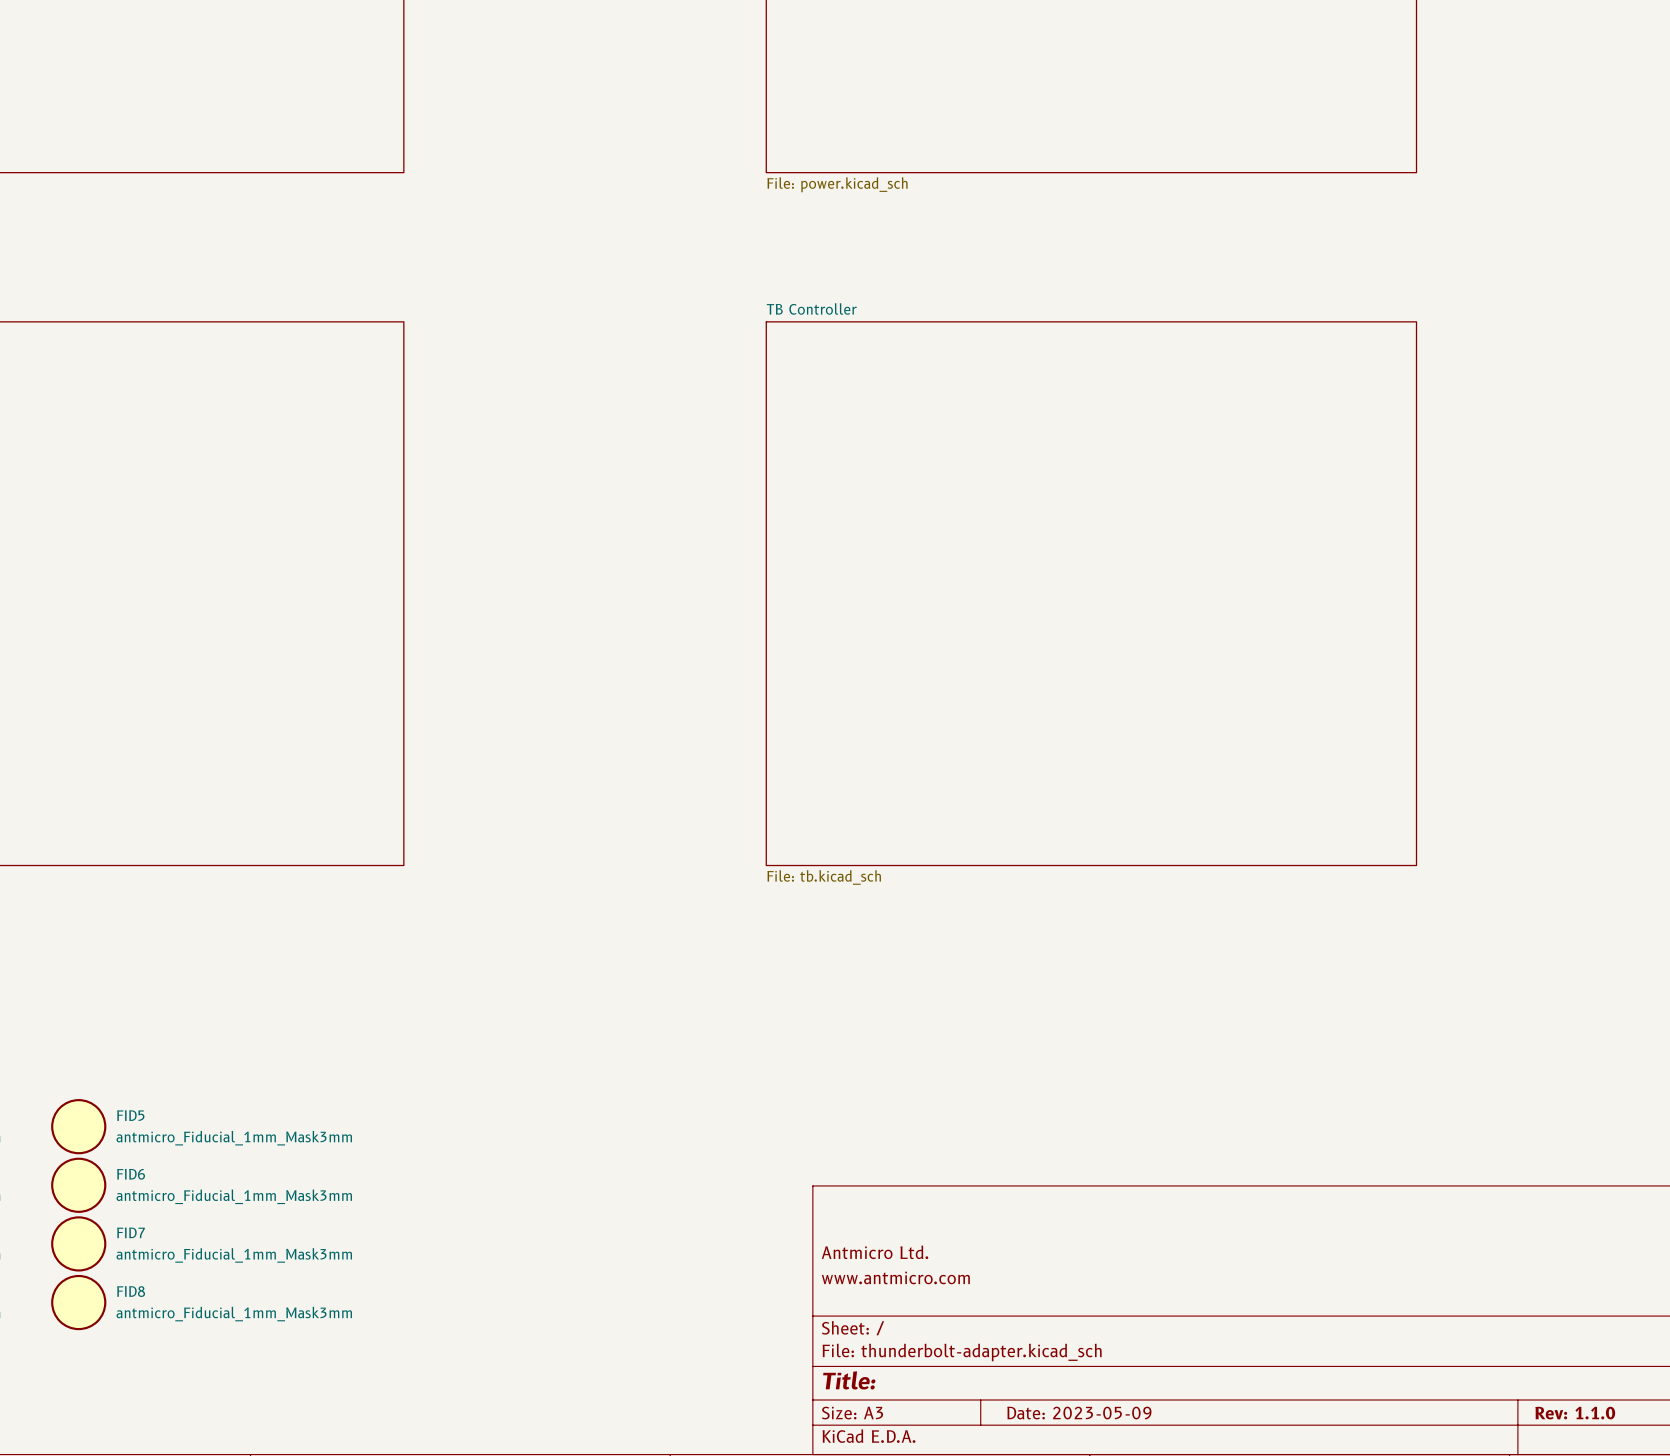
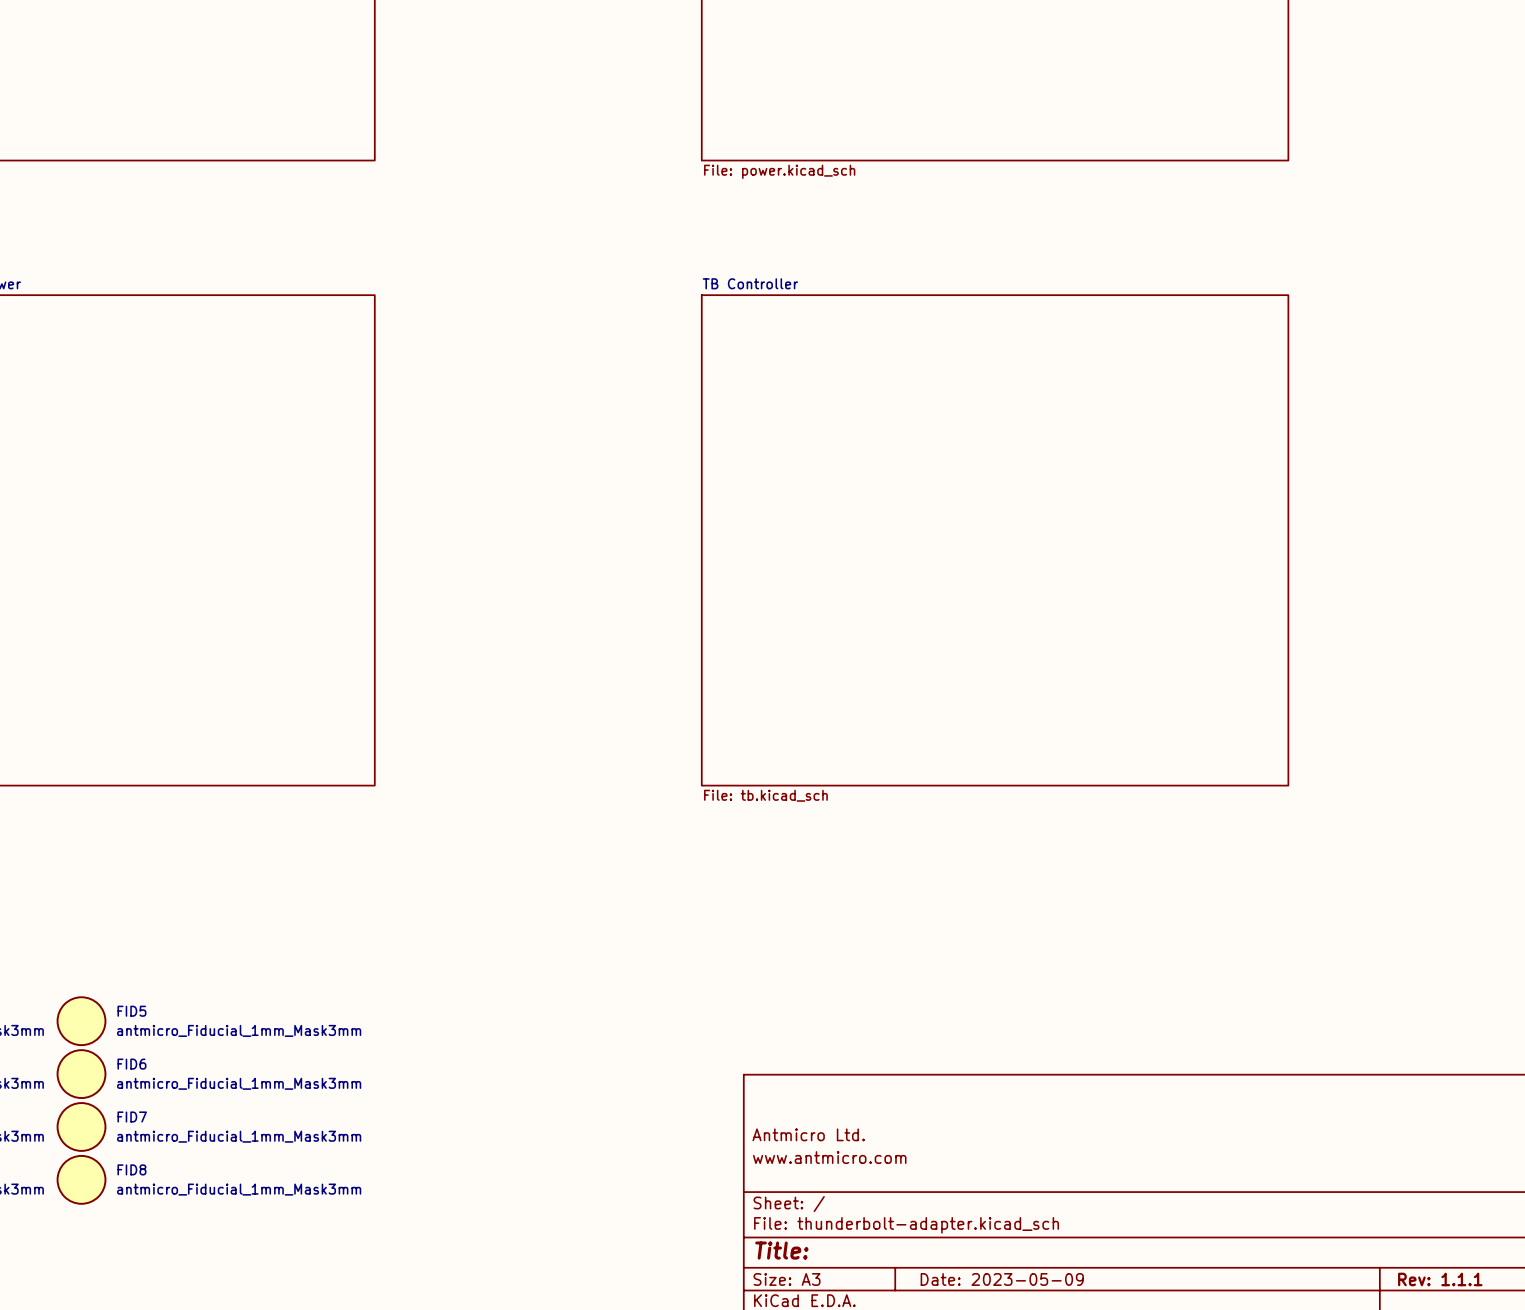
title block: Rev: 1.1.0 (1575, 1413) -> Rev: 1.1.1 (1440, 1279)

